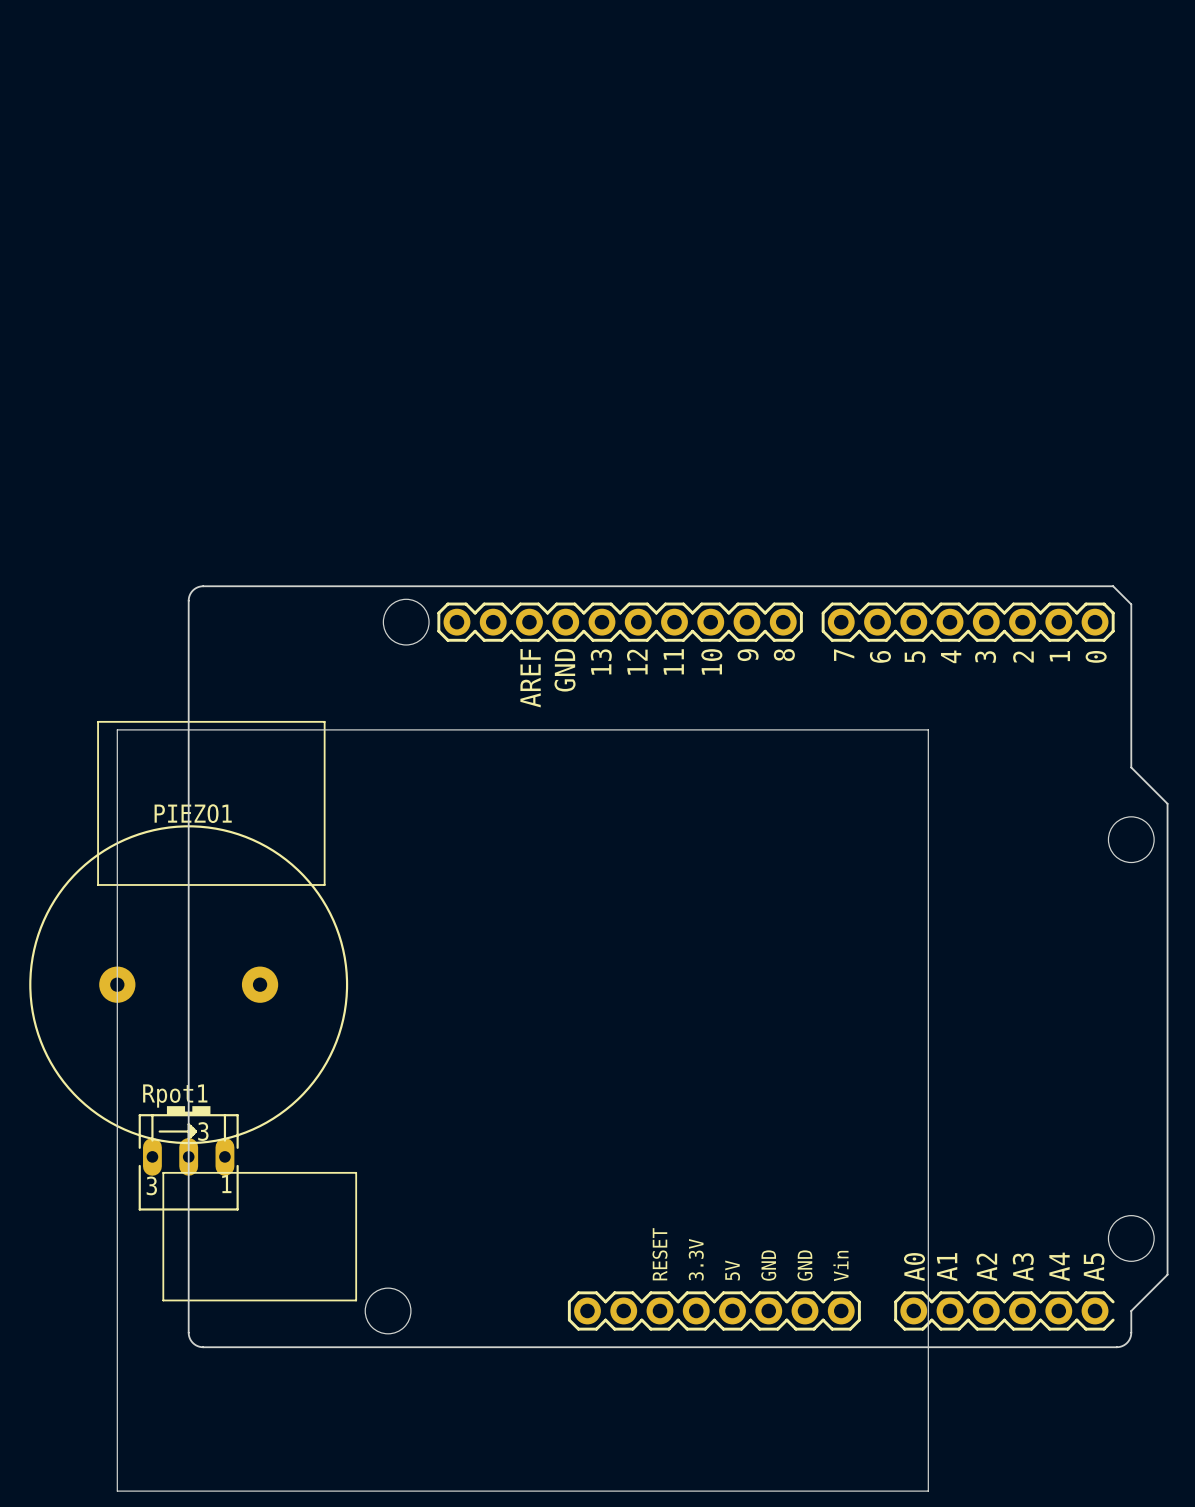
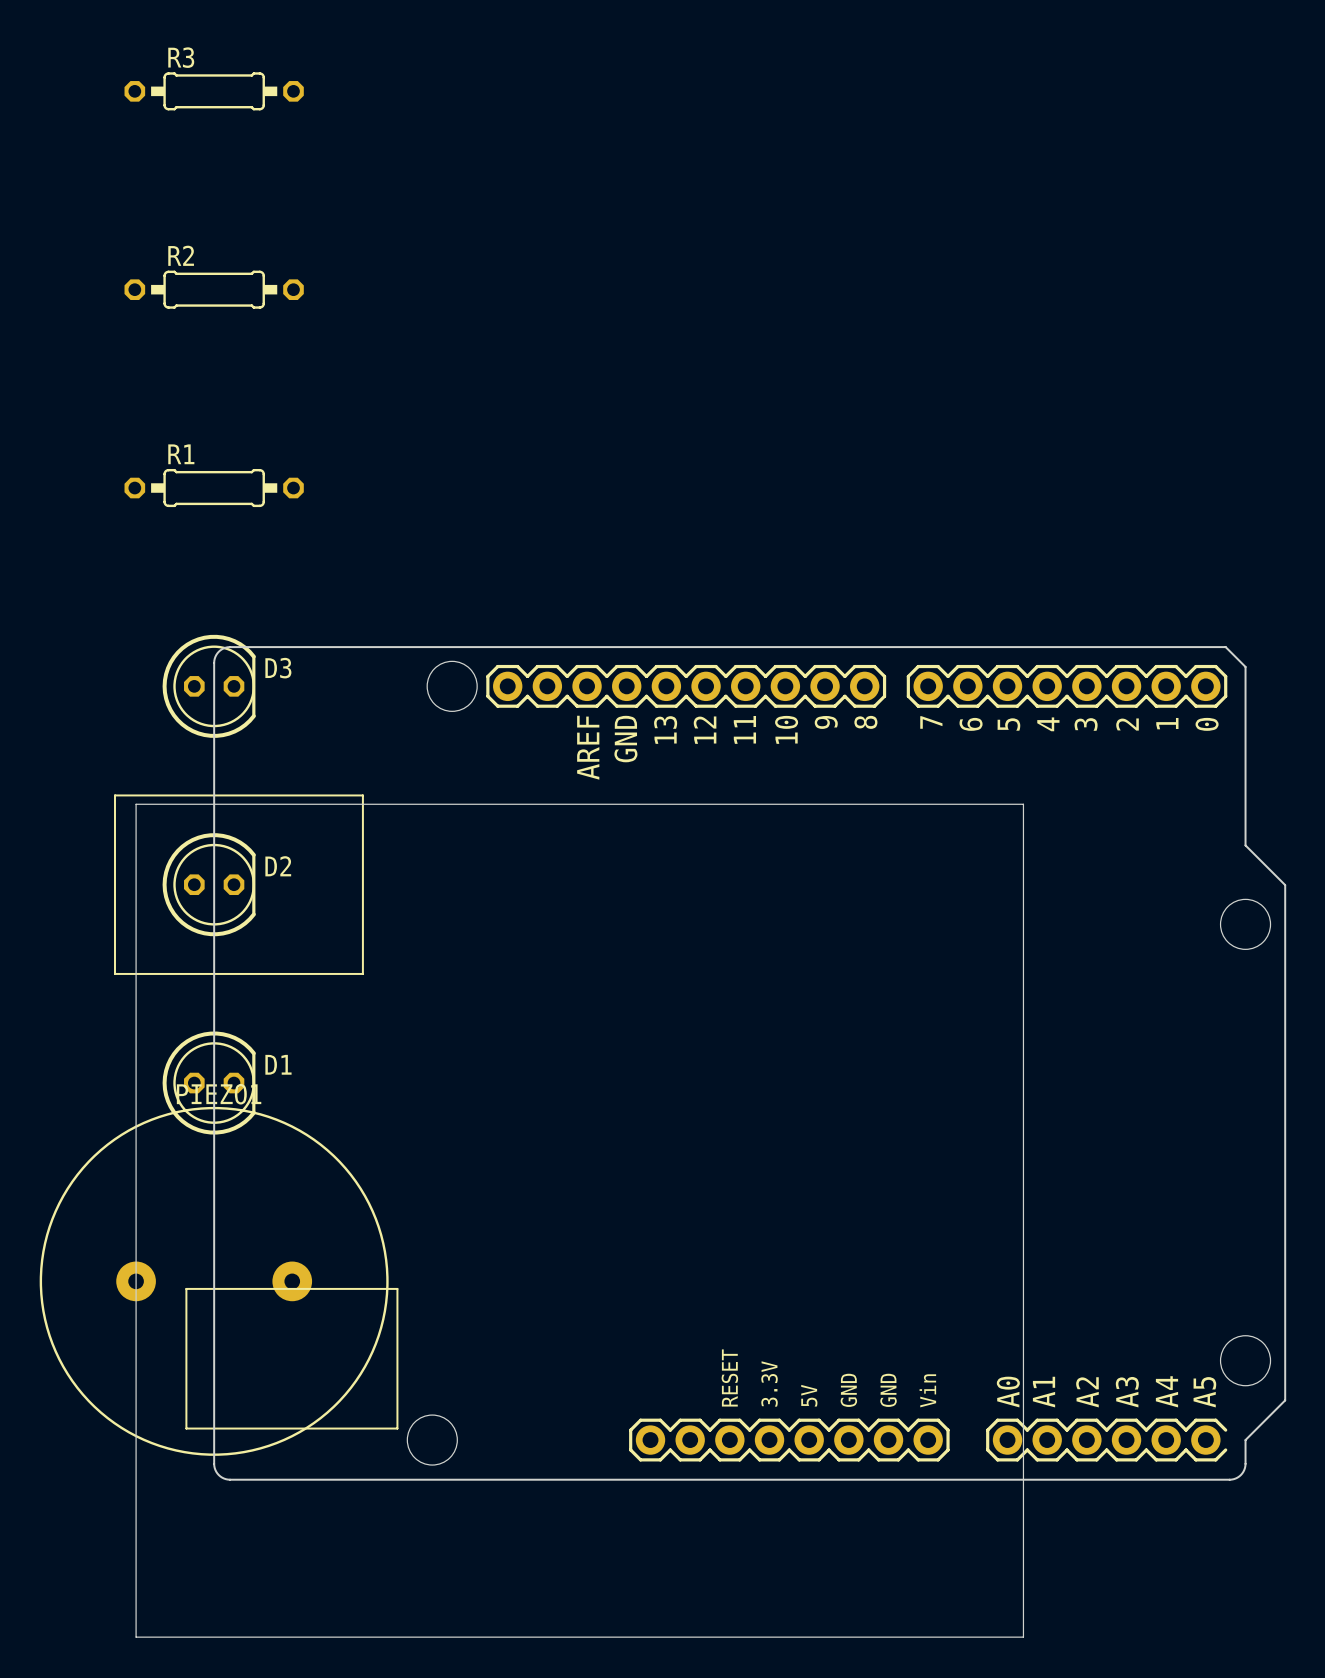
R3: none -> (214, 91)
R2: none -> (214, 289)
R1: none -> (214, 488)
D3: none -> (209, 686)
D2: none -> (209, 884)
D1: none -> (209, 1083)
PIEZO1 position: (188, 984) -> (214, 1281)
Rpot1: (188, 1158) -> none

